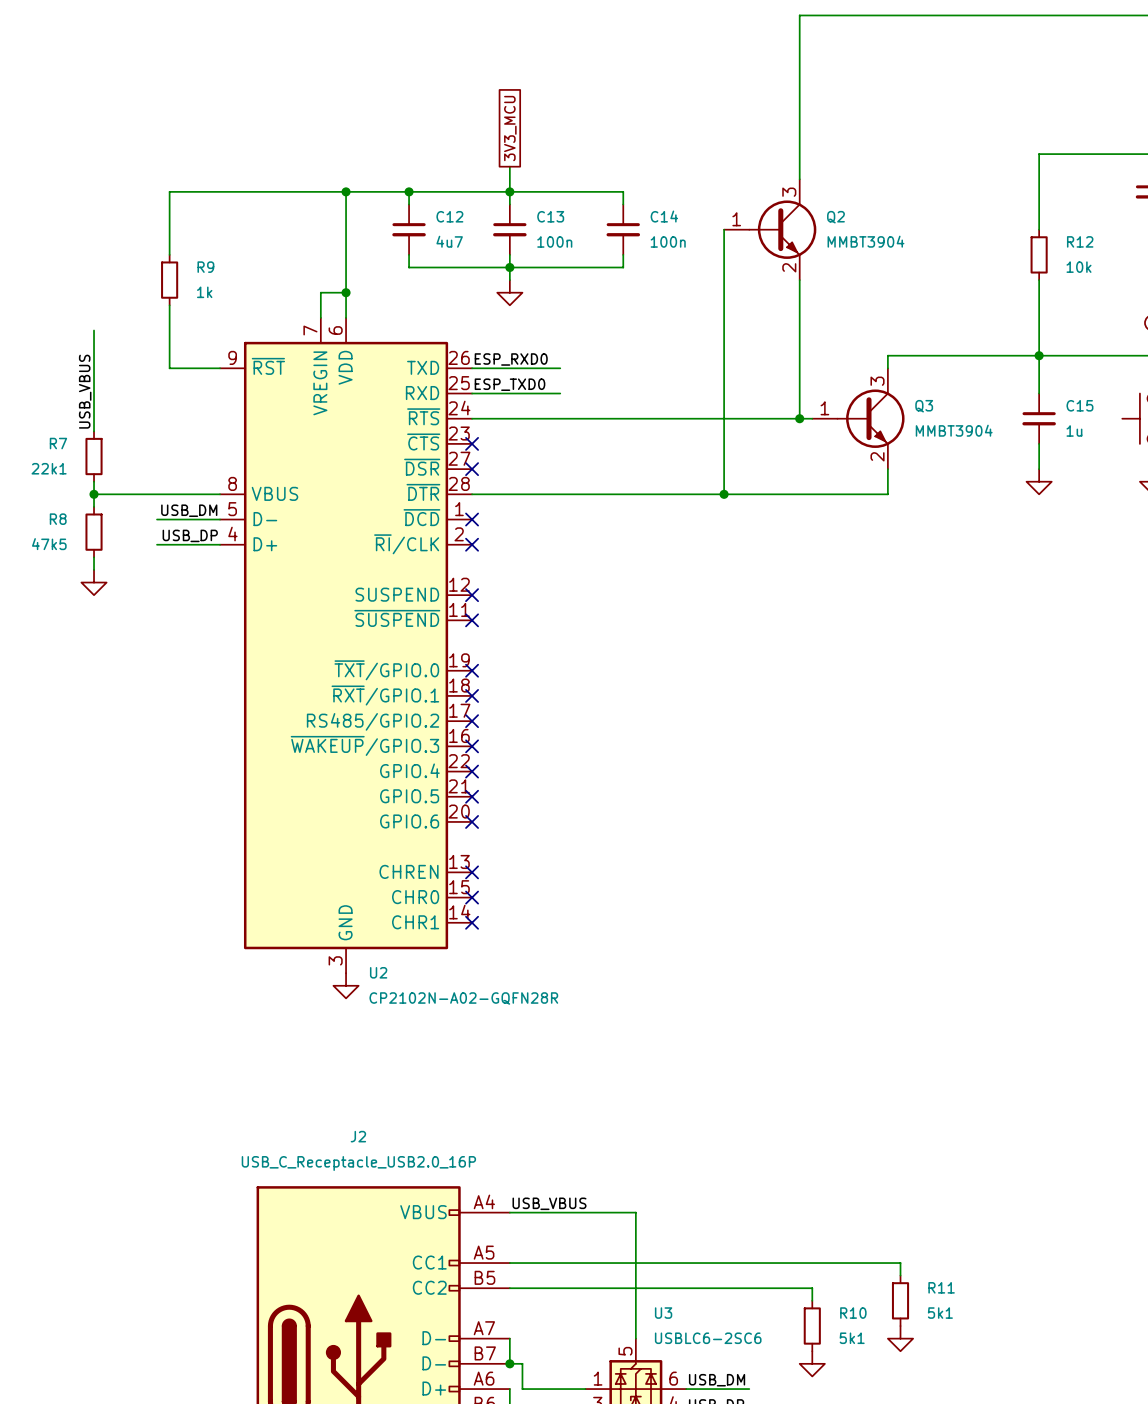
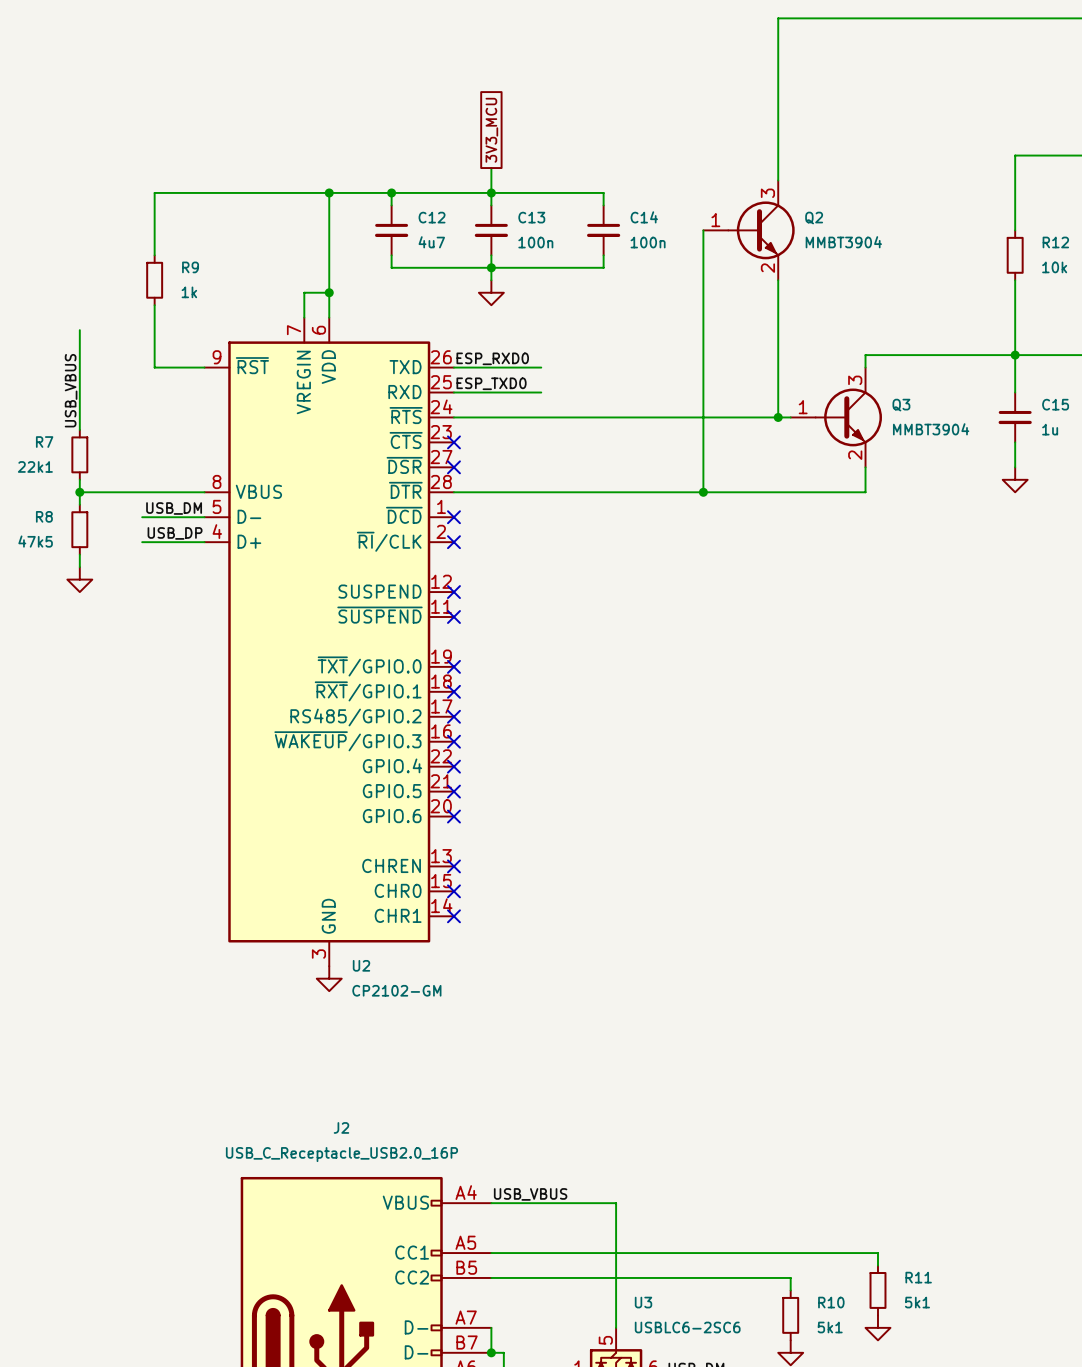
U2 value: CP2102N-A02-GQFN28R (463, 998) -> CP2102-GM (396, 990)

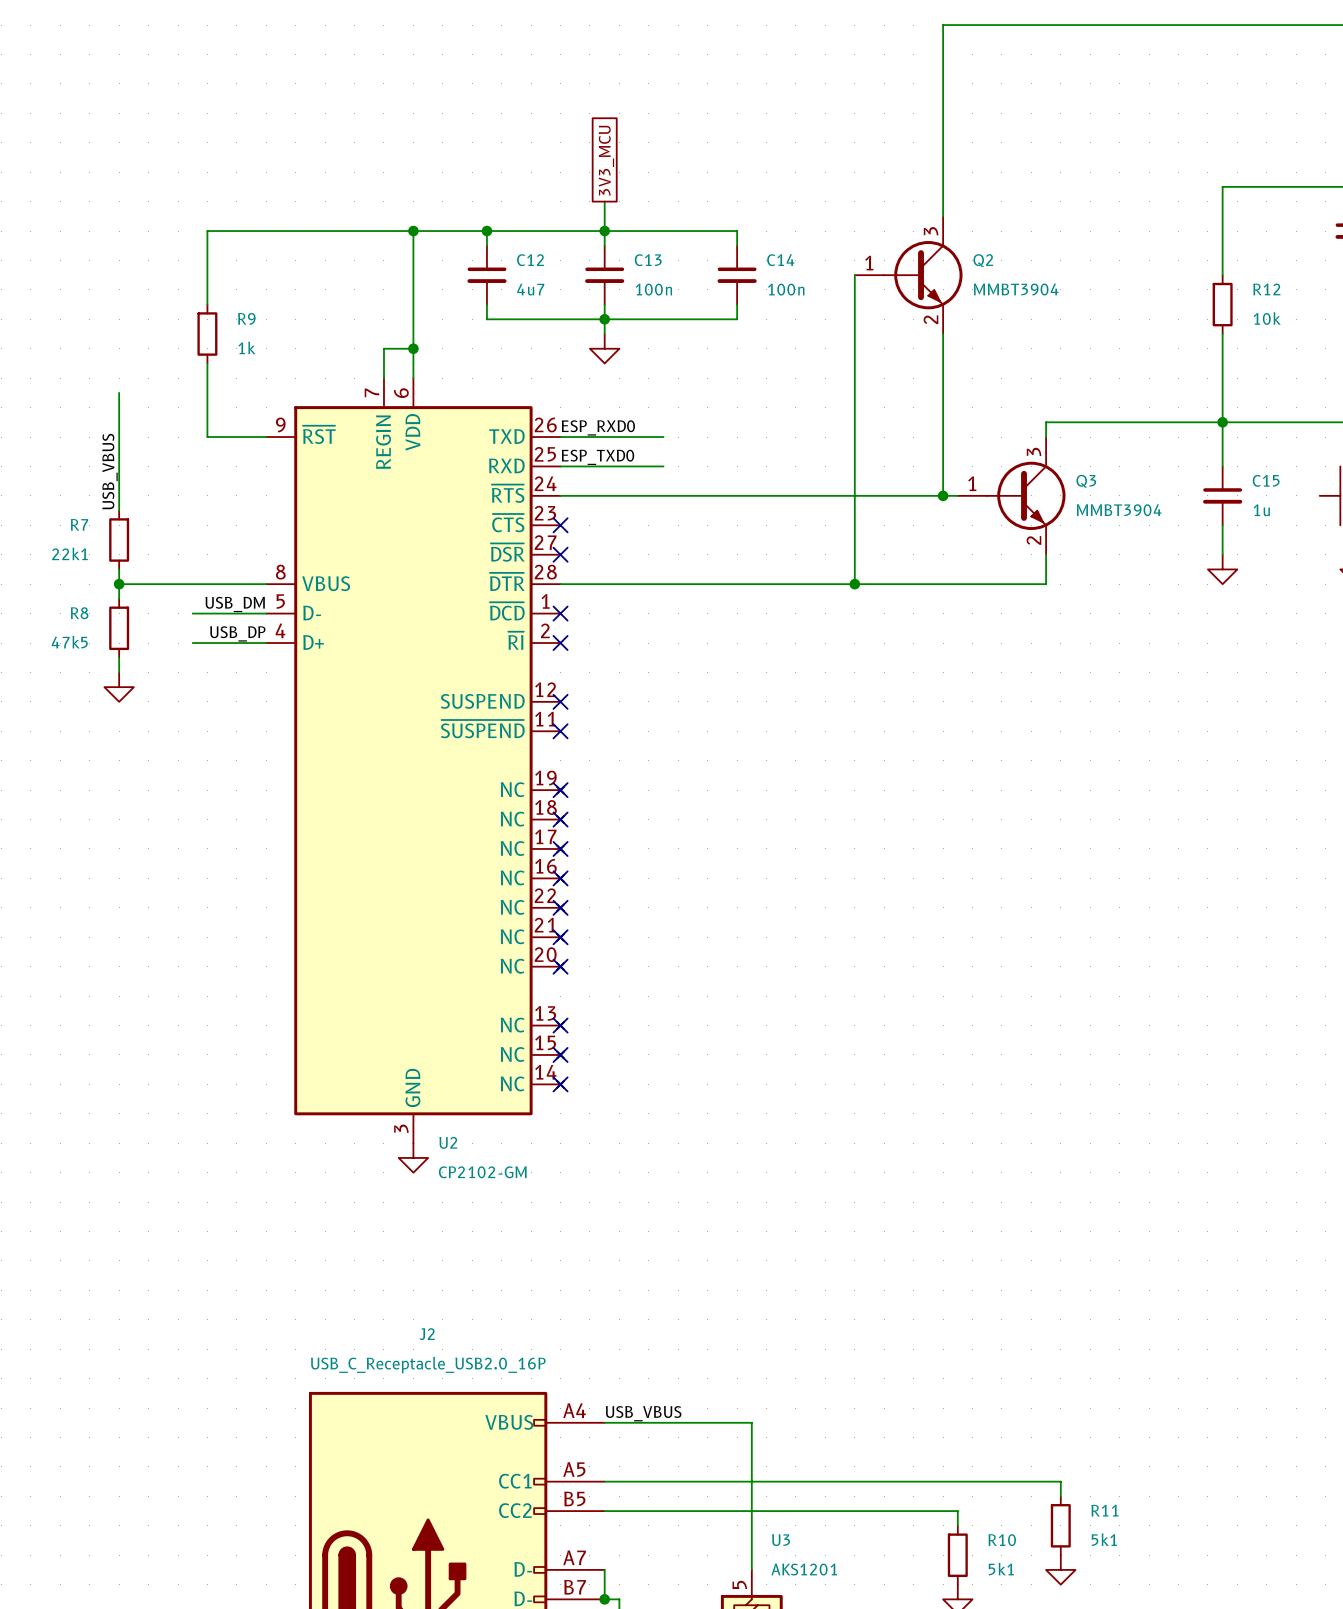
U2 symbol: [204, 317, 454, 967] -> [266, 378, 565, 1144]
U3 value: USBLC6-2SC6 (687, 1327) -> AKS1201 (804, 1569)

